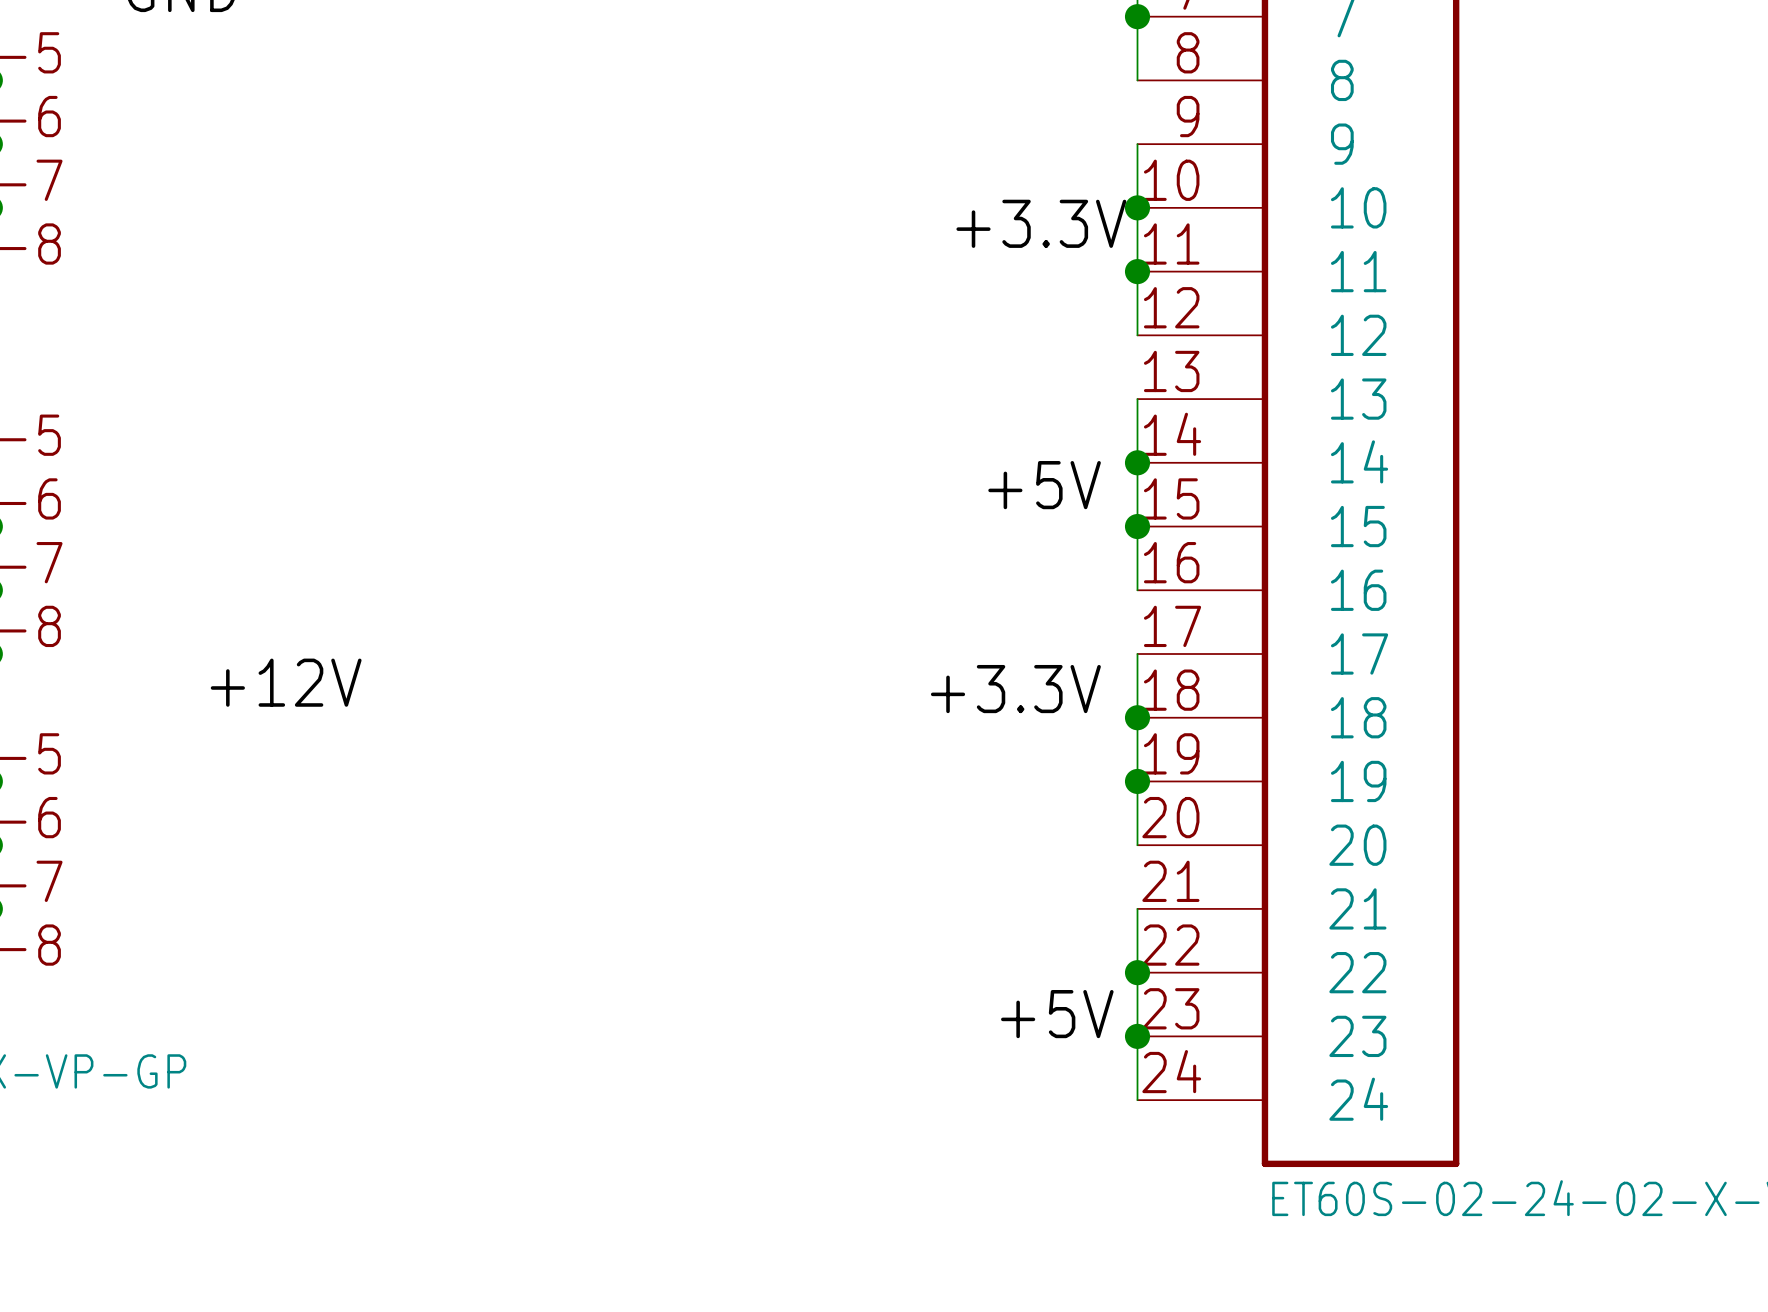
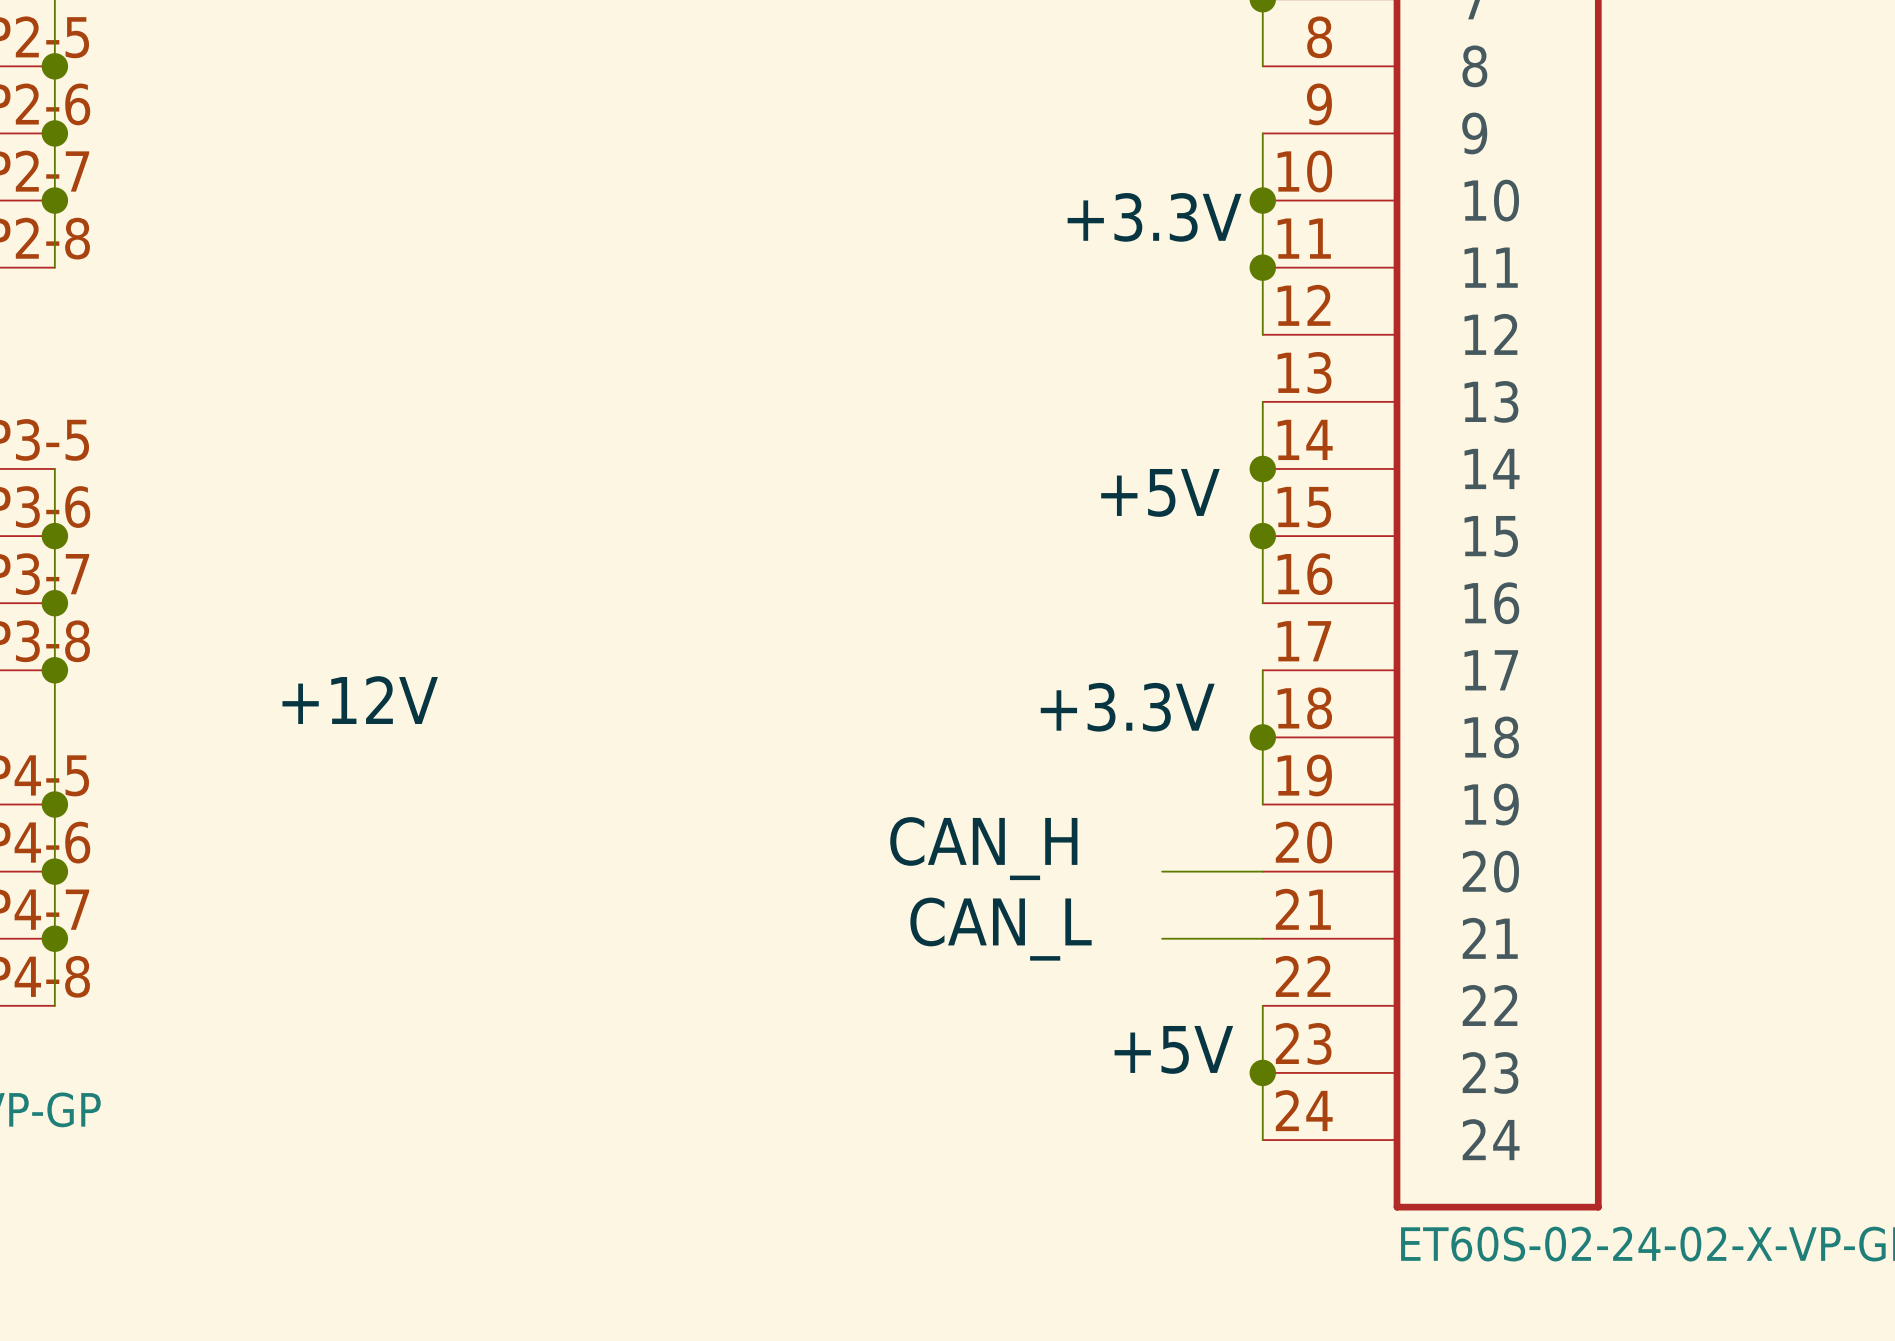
wire: (1137, 781) (1137, 845) -> (1162, 871) (1262, 871)
junction: (1137, 781) -> none
label: none -> CAN_H (983, 848)
label: none -> CAN_L (1001, 929)
wire: (1137, 908) (1137, 972) -> (1262, 938) (1162, 938)
junction: (1137, 972) -> none

